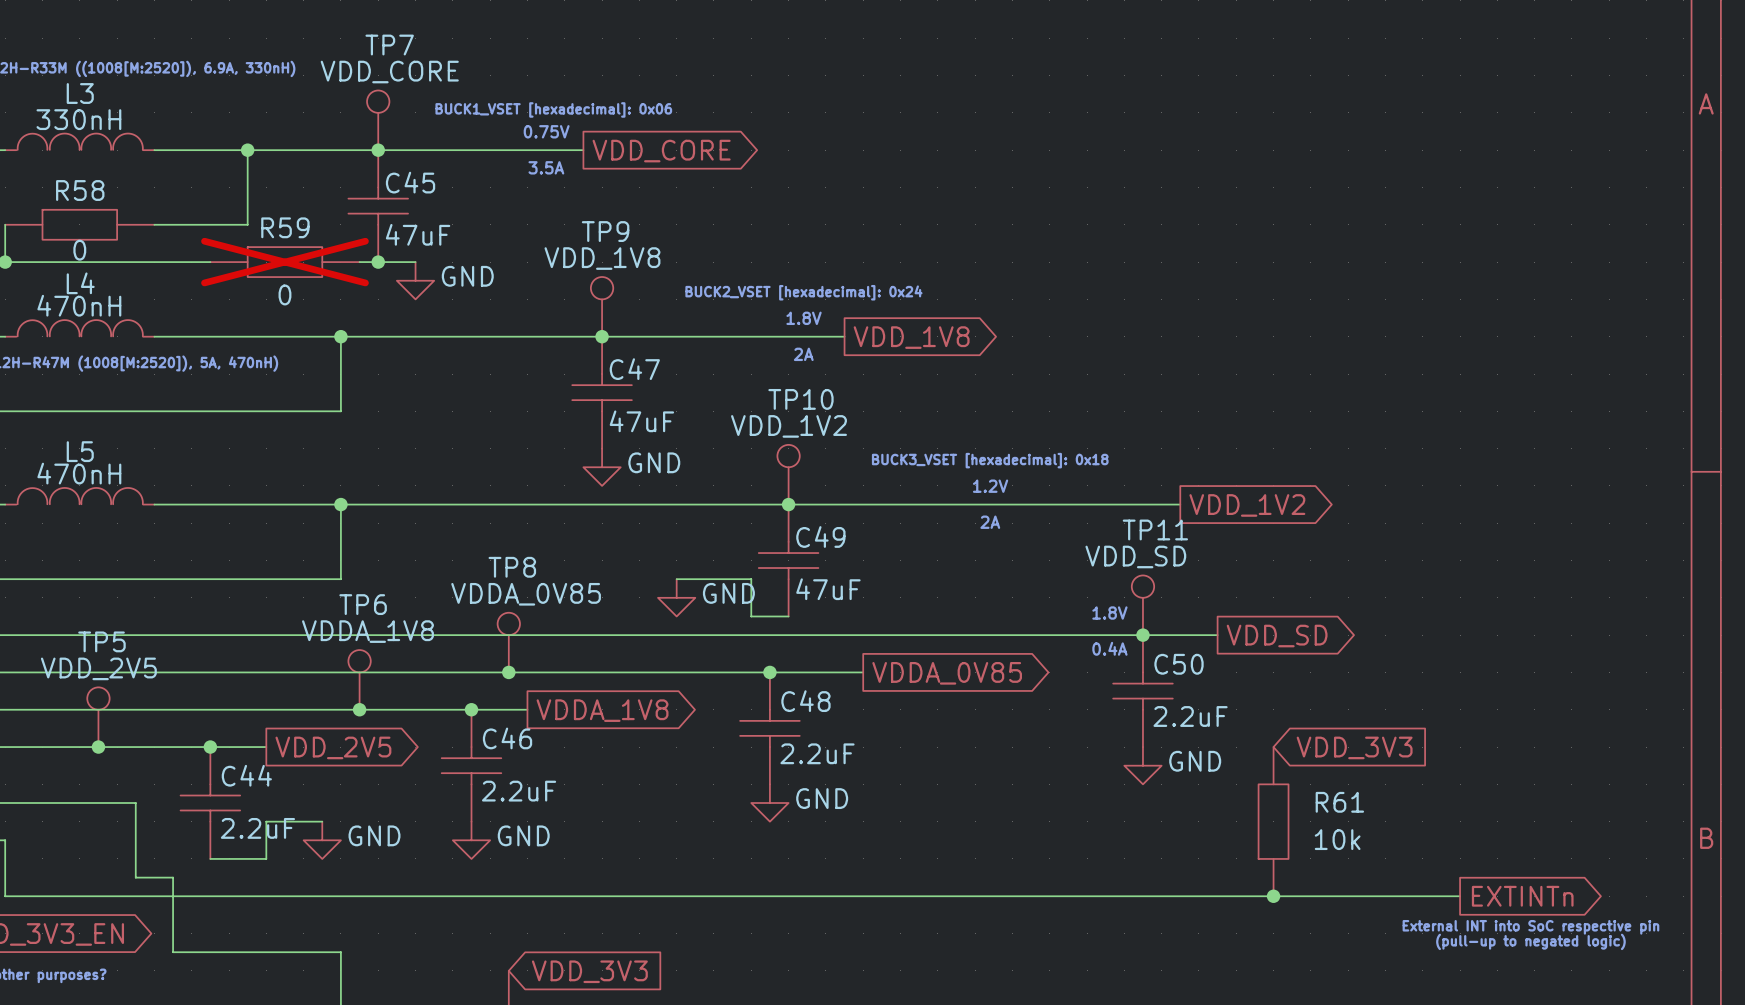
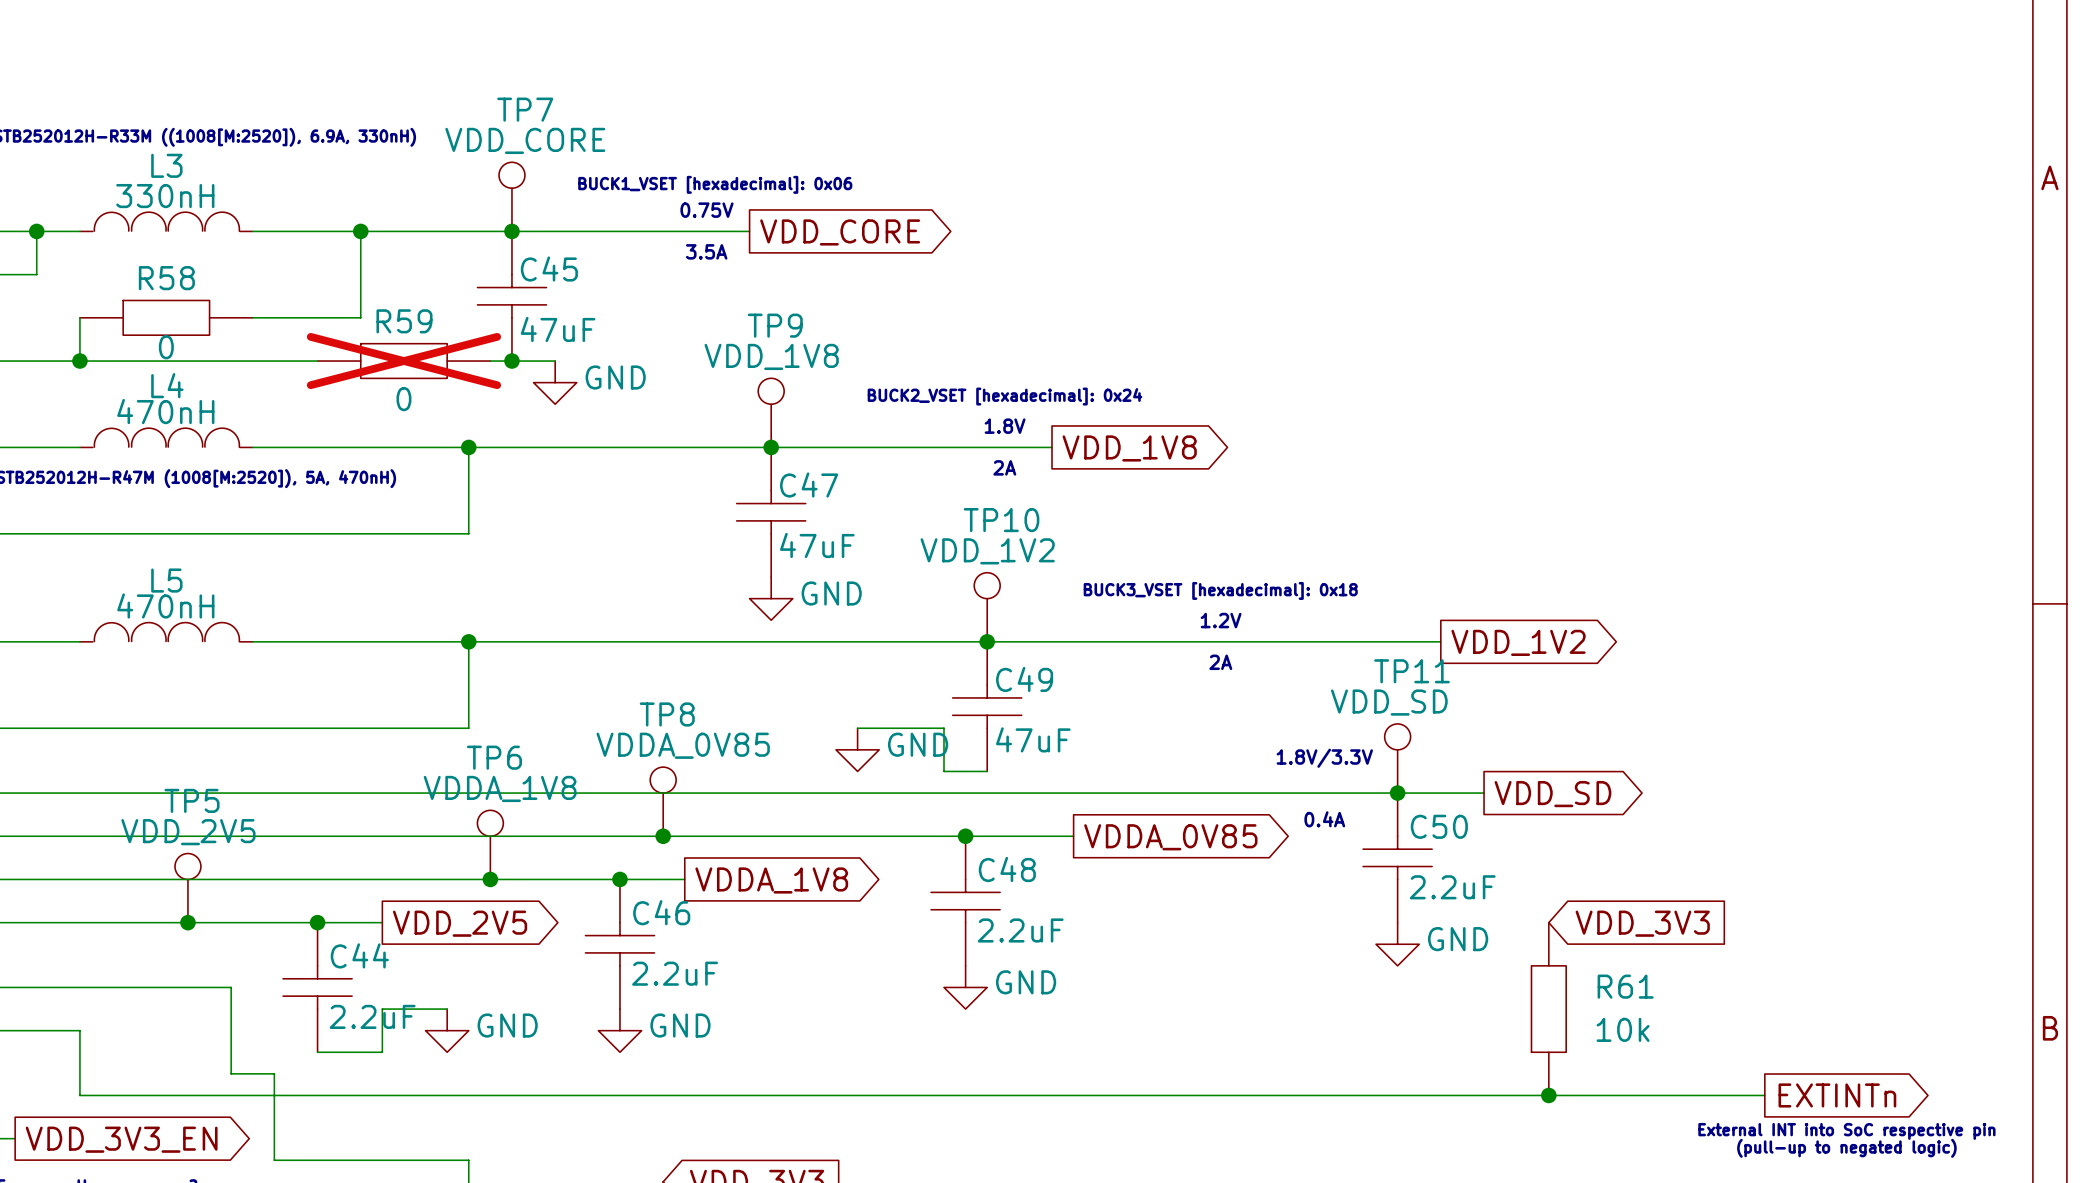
text: 1.8V (1109, 613) -> 1.8V/3.3V (1324, 758)
text position: 0.4A (1109, 648) -> 0.4A (1324, 819)

